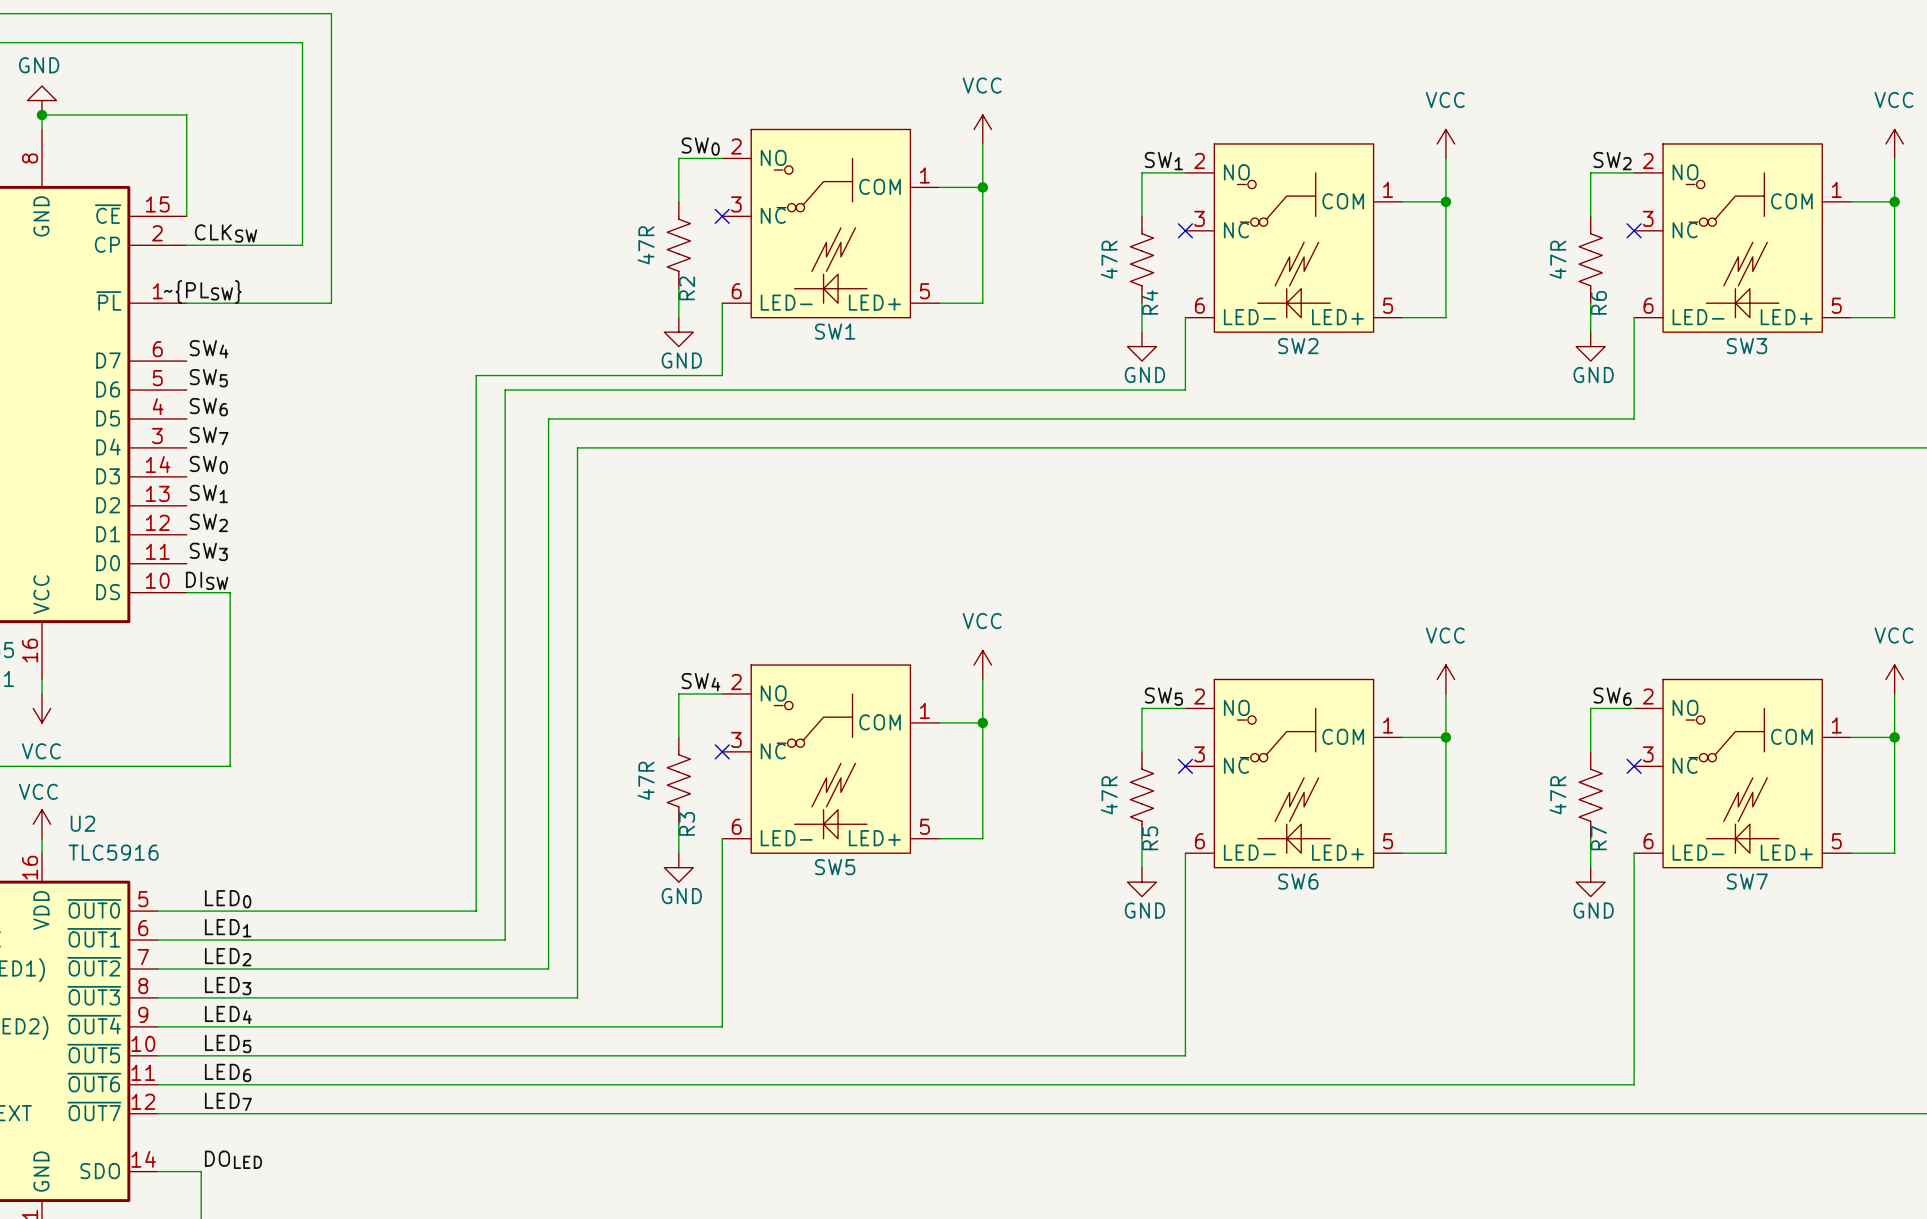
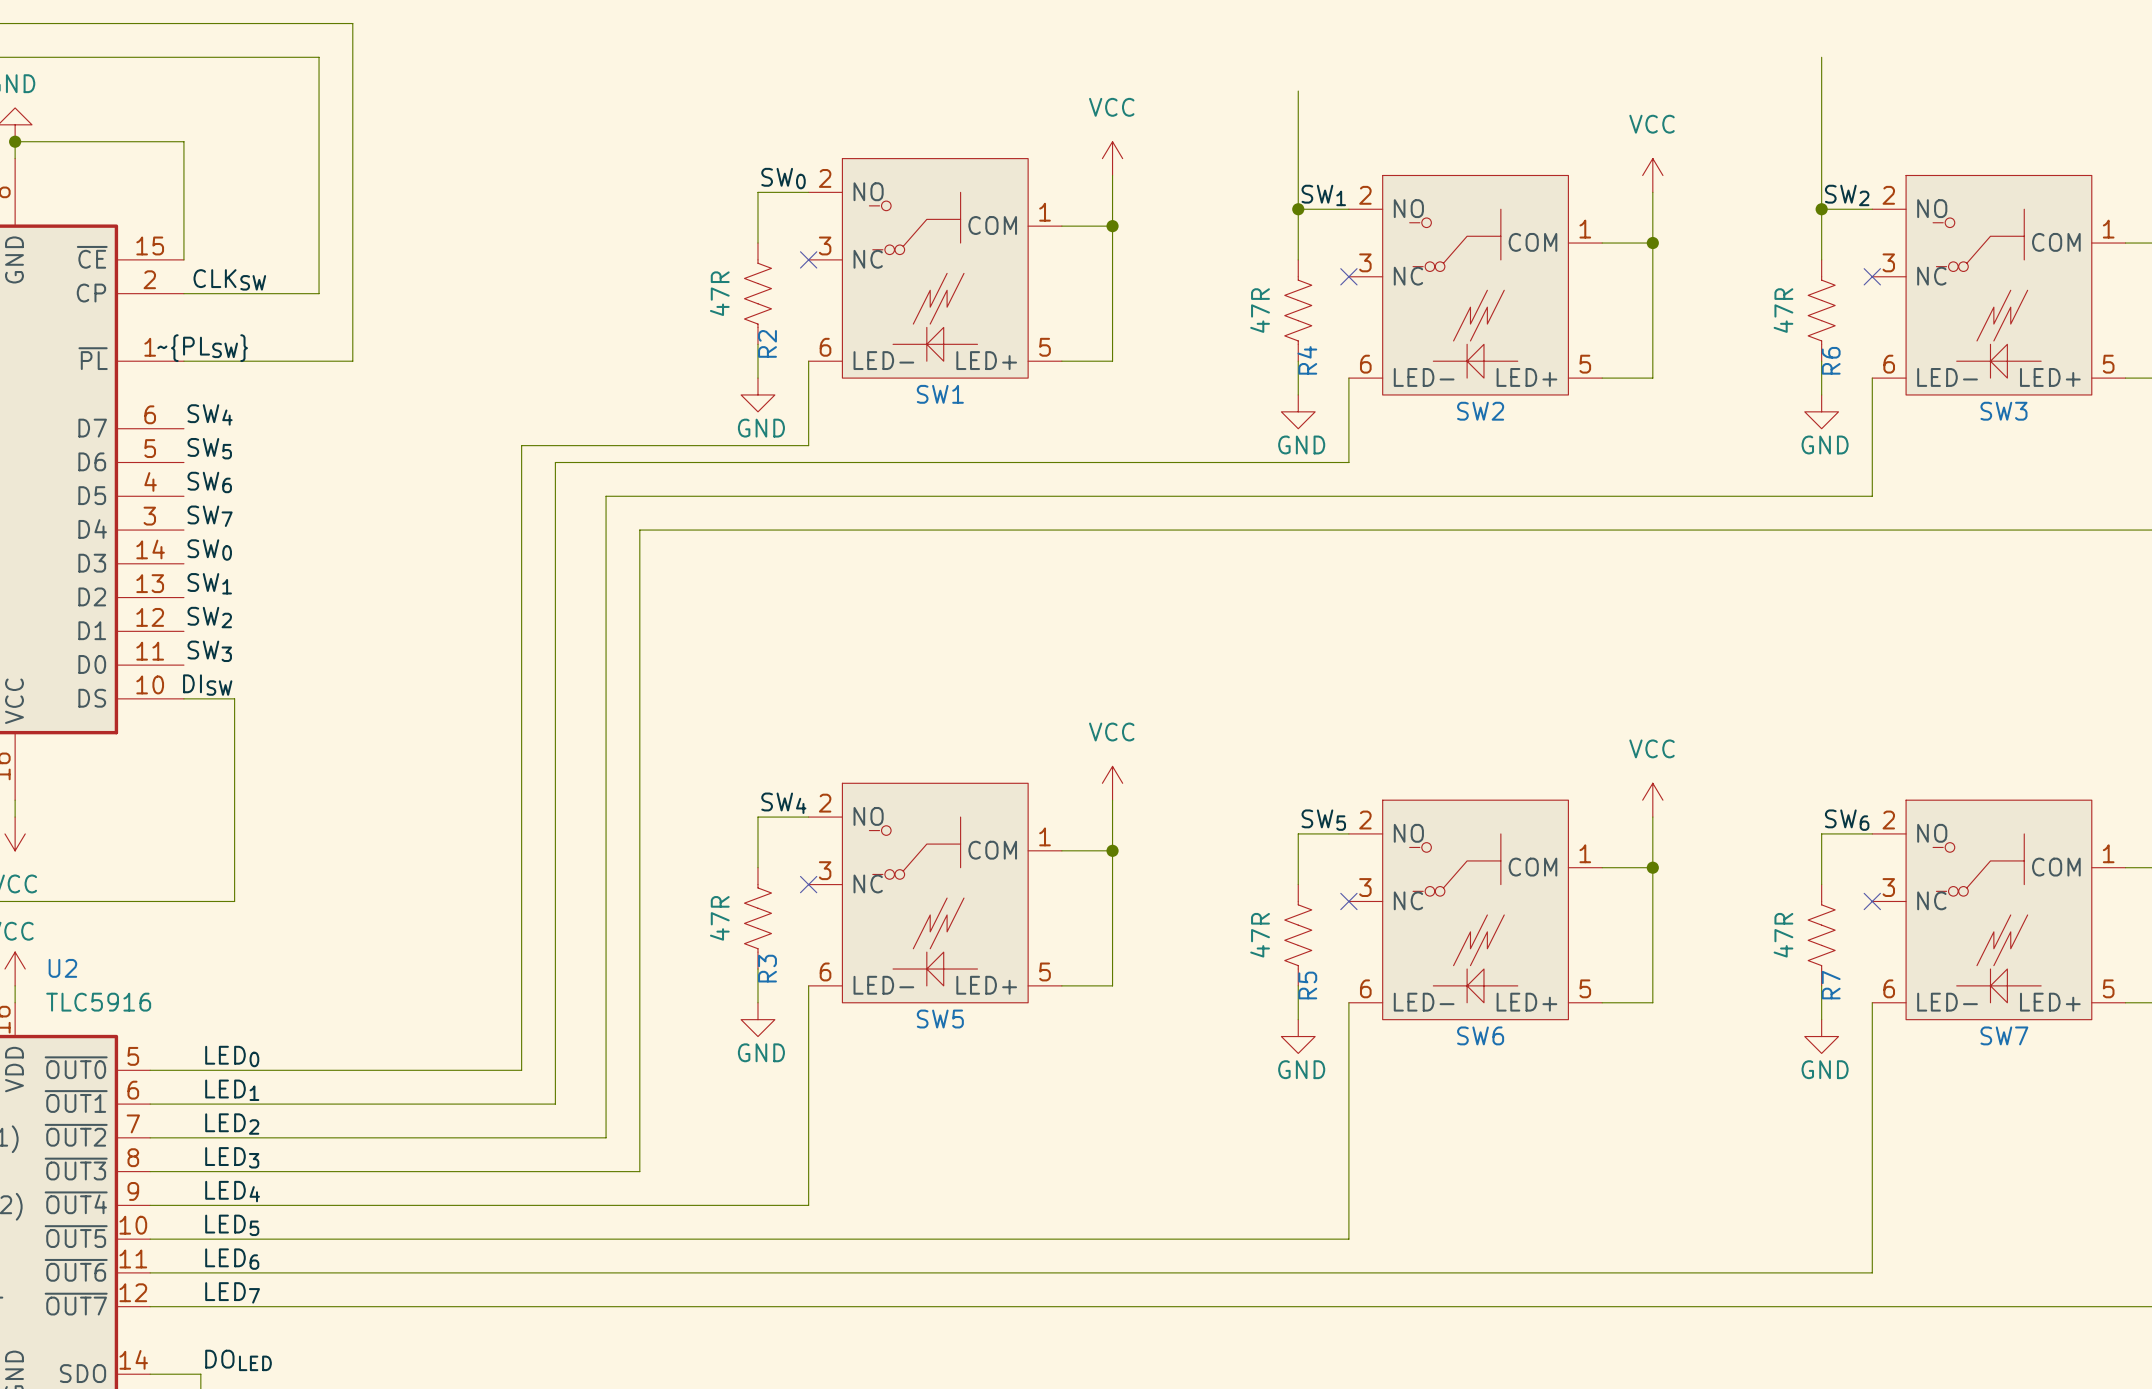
wire: none -> (1821, 57) (1821, 209)
wire: none -> (1298, 91) (1298, 209)
junction: none -> (1298, 209)
junction: none -> (1821, 209)

